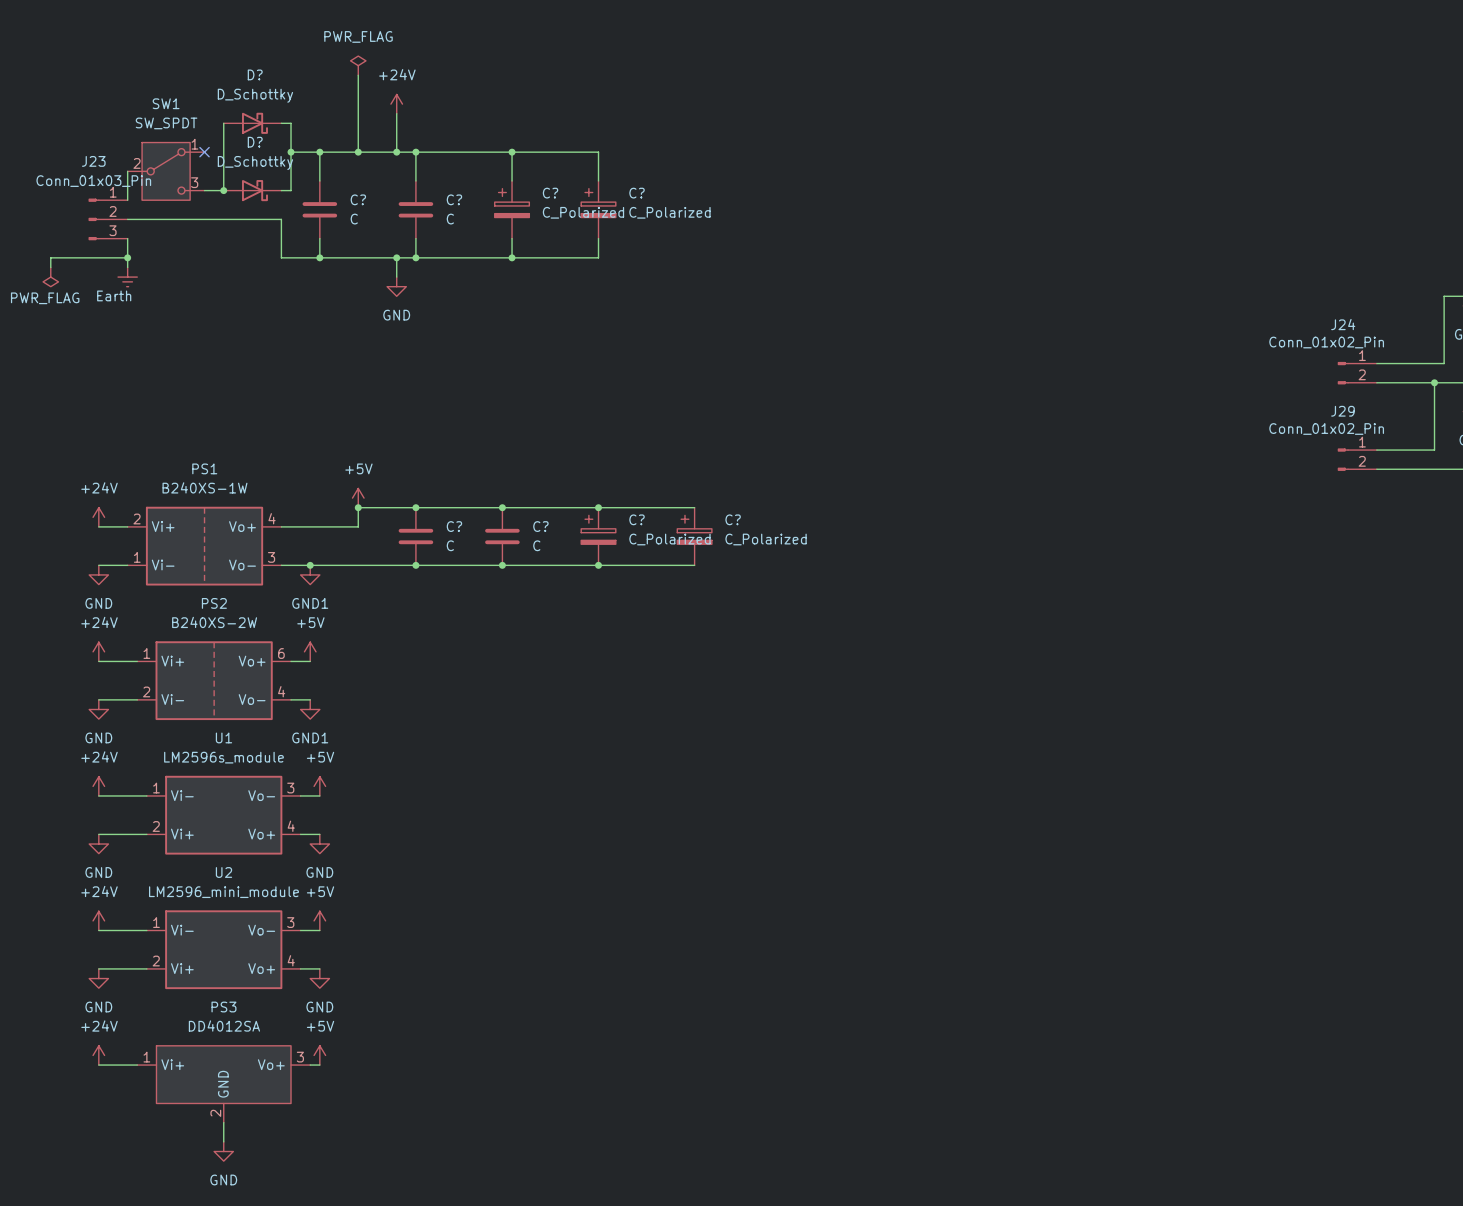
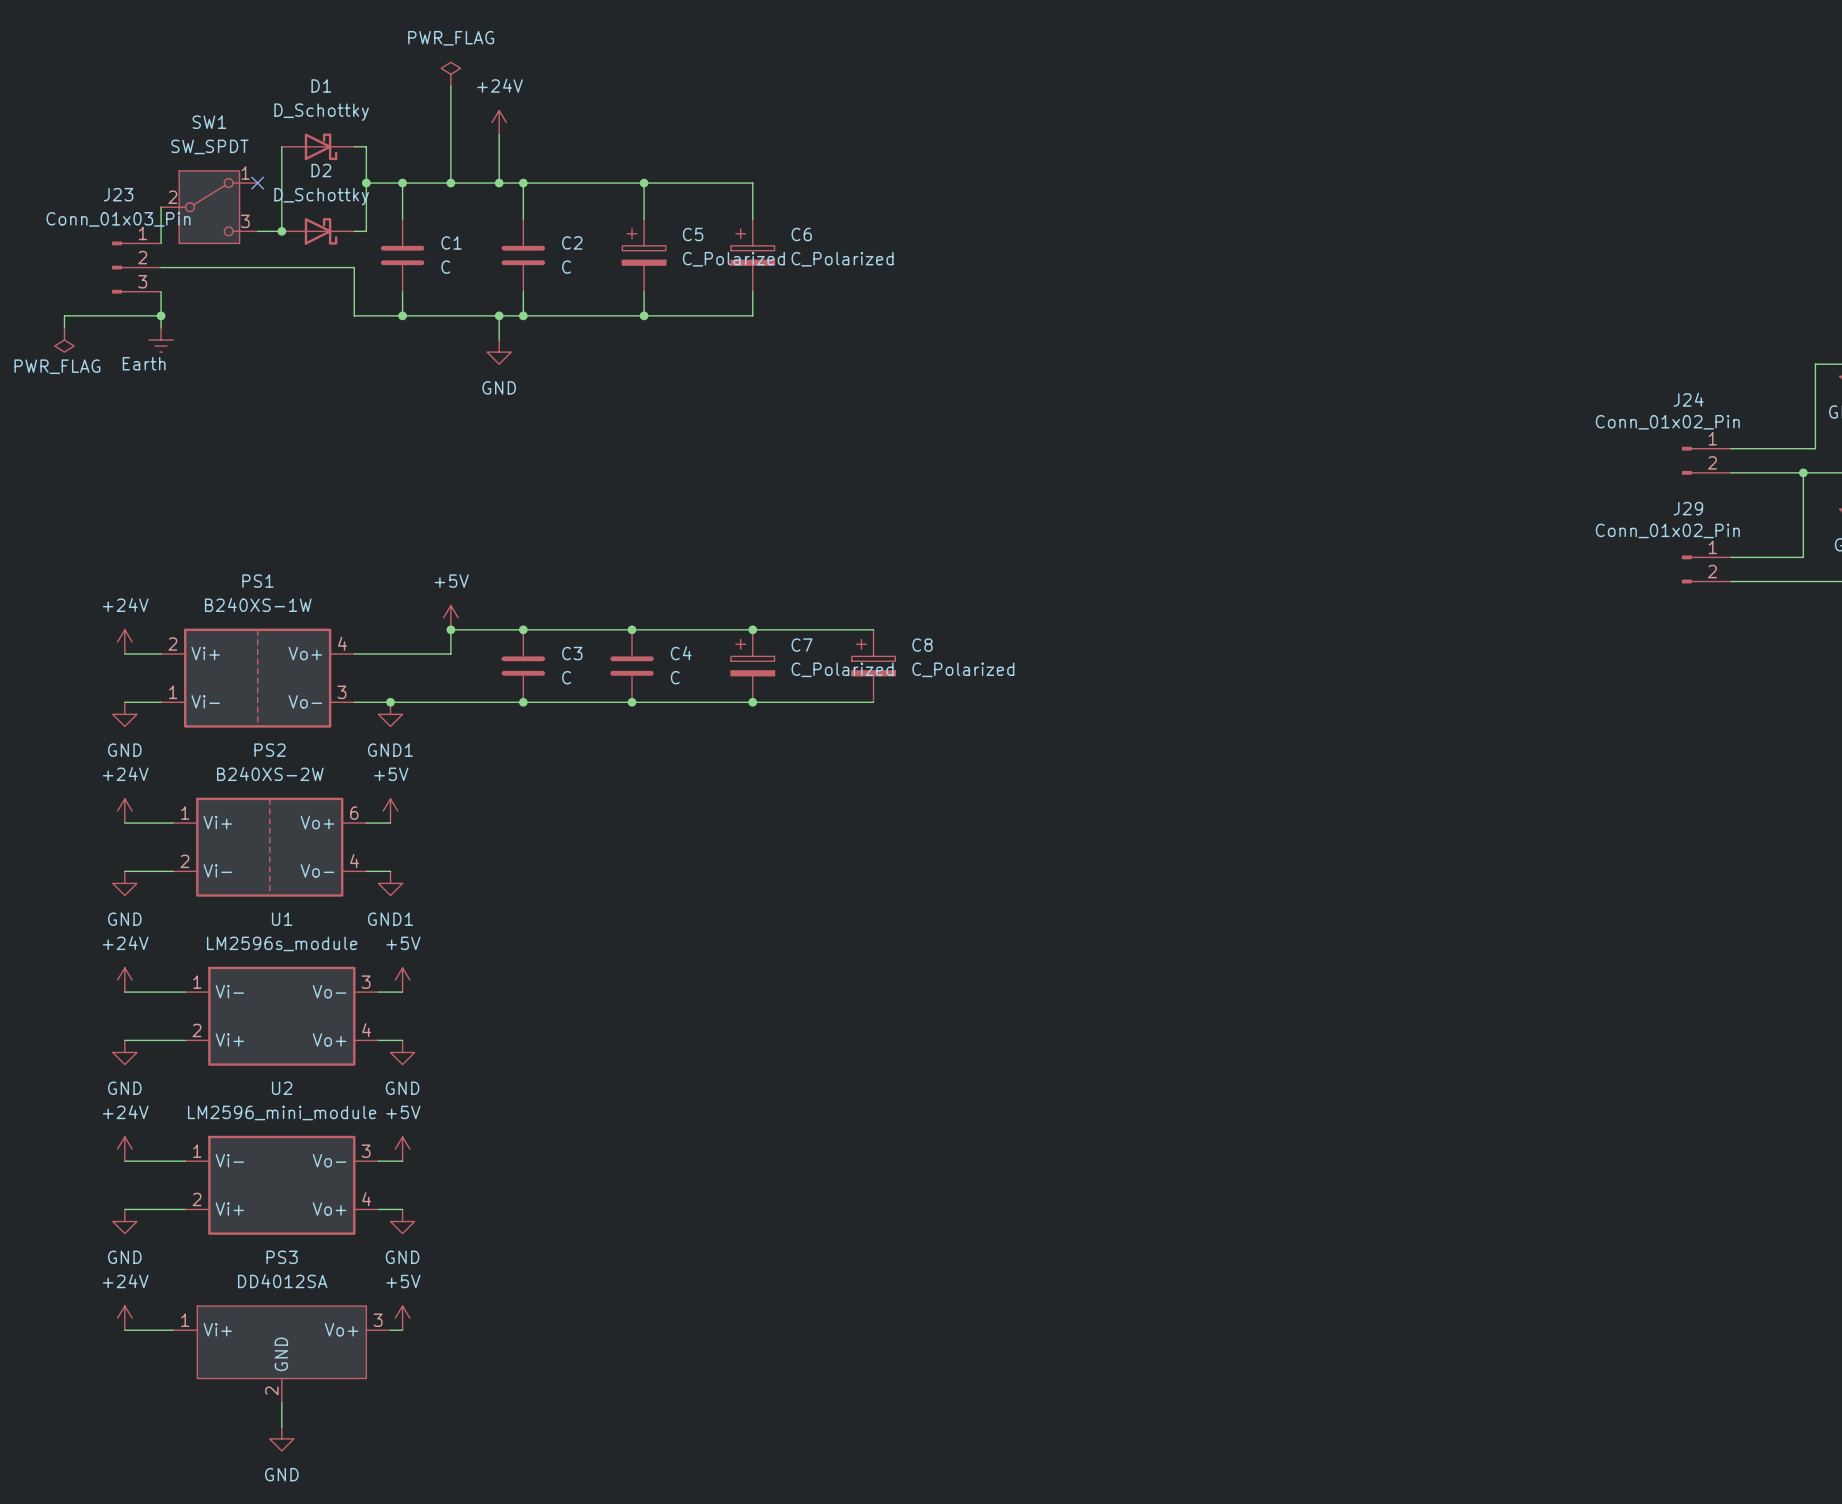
D? name: D? (255, 74) -> D1 (321, 85)
D? name: D? (255, 142) -> D2 (321, 170)
C? name: C? (550, 193) -> C5 (693, 234)
C? name: C? (637, 193) -> C6 (801, 234)
C? name: C? (358, 199) -> C1 (451, 242)
C? name: C? (454, 199) -> C2 (572, 242)
C? name: C? (637, 519) -> C7 (802, 645)
C? name: C? (733, 519) -> C8 (922, 645)
C? name: C? (454, 526) -> C3 (572, 653)
C? name: C? (540, 526) -> C4 (681, 653)

